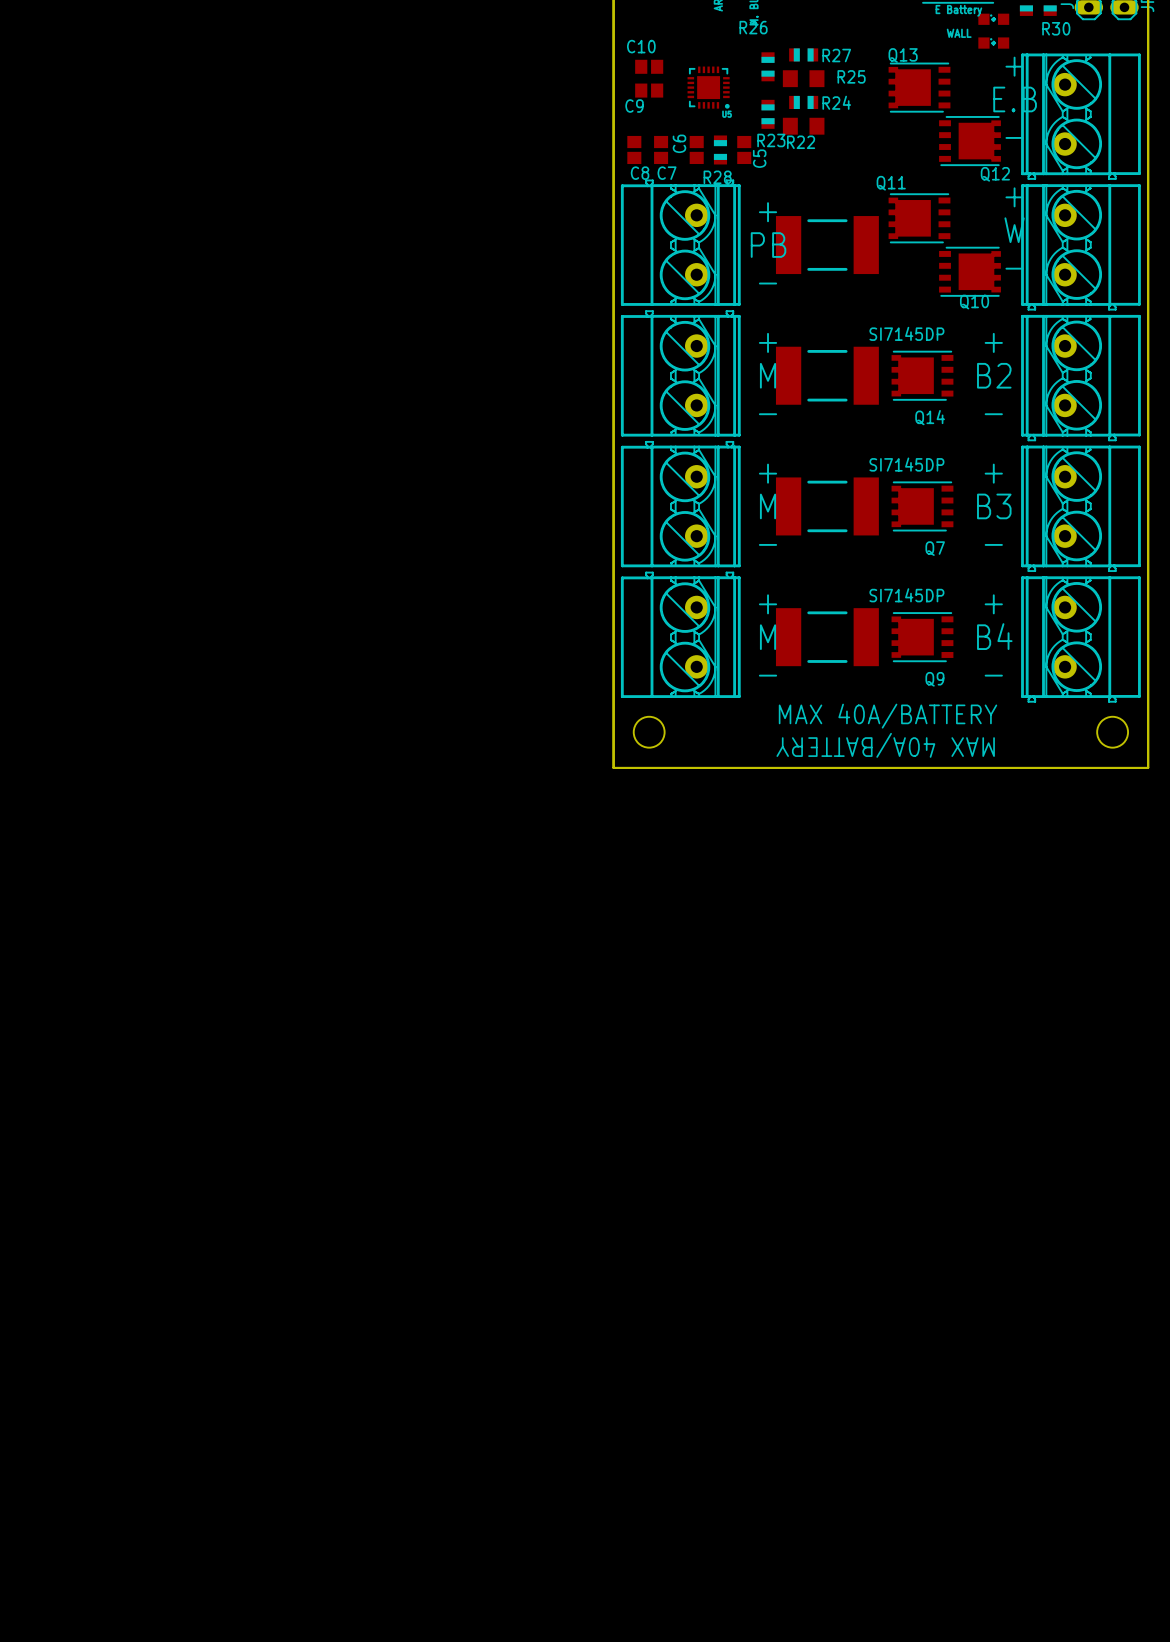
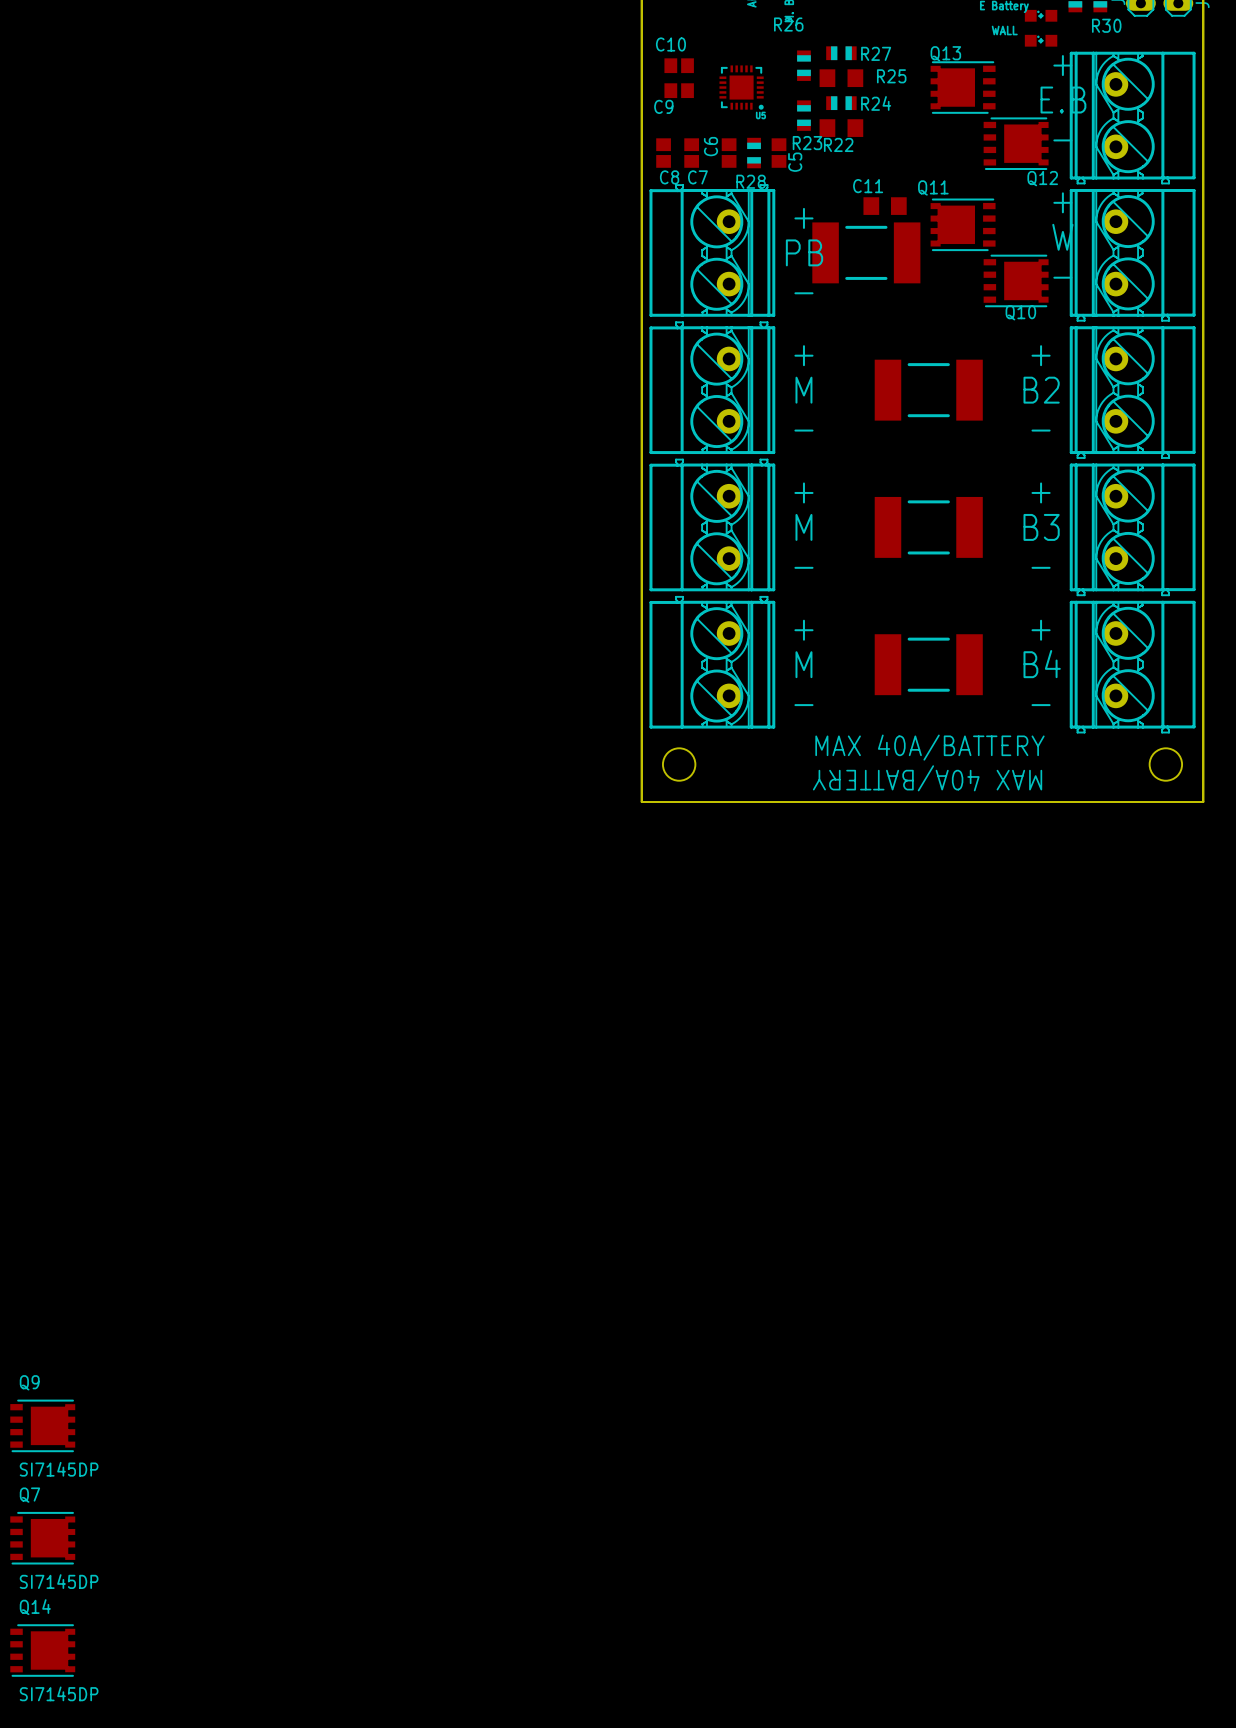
C11: none -> (885, 206)
part position: (827, 375) -> (928, 390)
Q14 rotation: 0° (922, 375) -> 180° (42, 1650)
Q14 position: (922, 375) -> (42, 1650)
part position: (827, 506) -> (928, 527)
Q7 rotation: 0° (922, 506) -> 180° (42, 1538)
Q7 position: (922, 506) -> (42, 1538)
part position: (827, 637) -> (928, 664)
Q9 rotation: 0° (922, 637) -> 180° (42, 1425)
Q9 position: (922, 637) -> (42, 1425)

